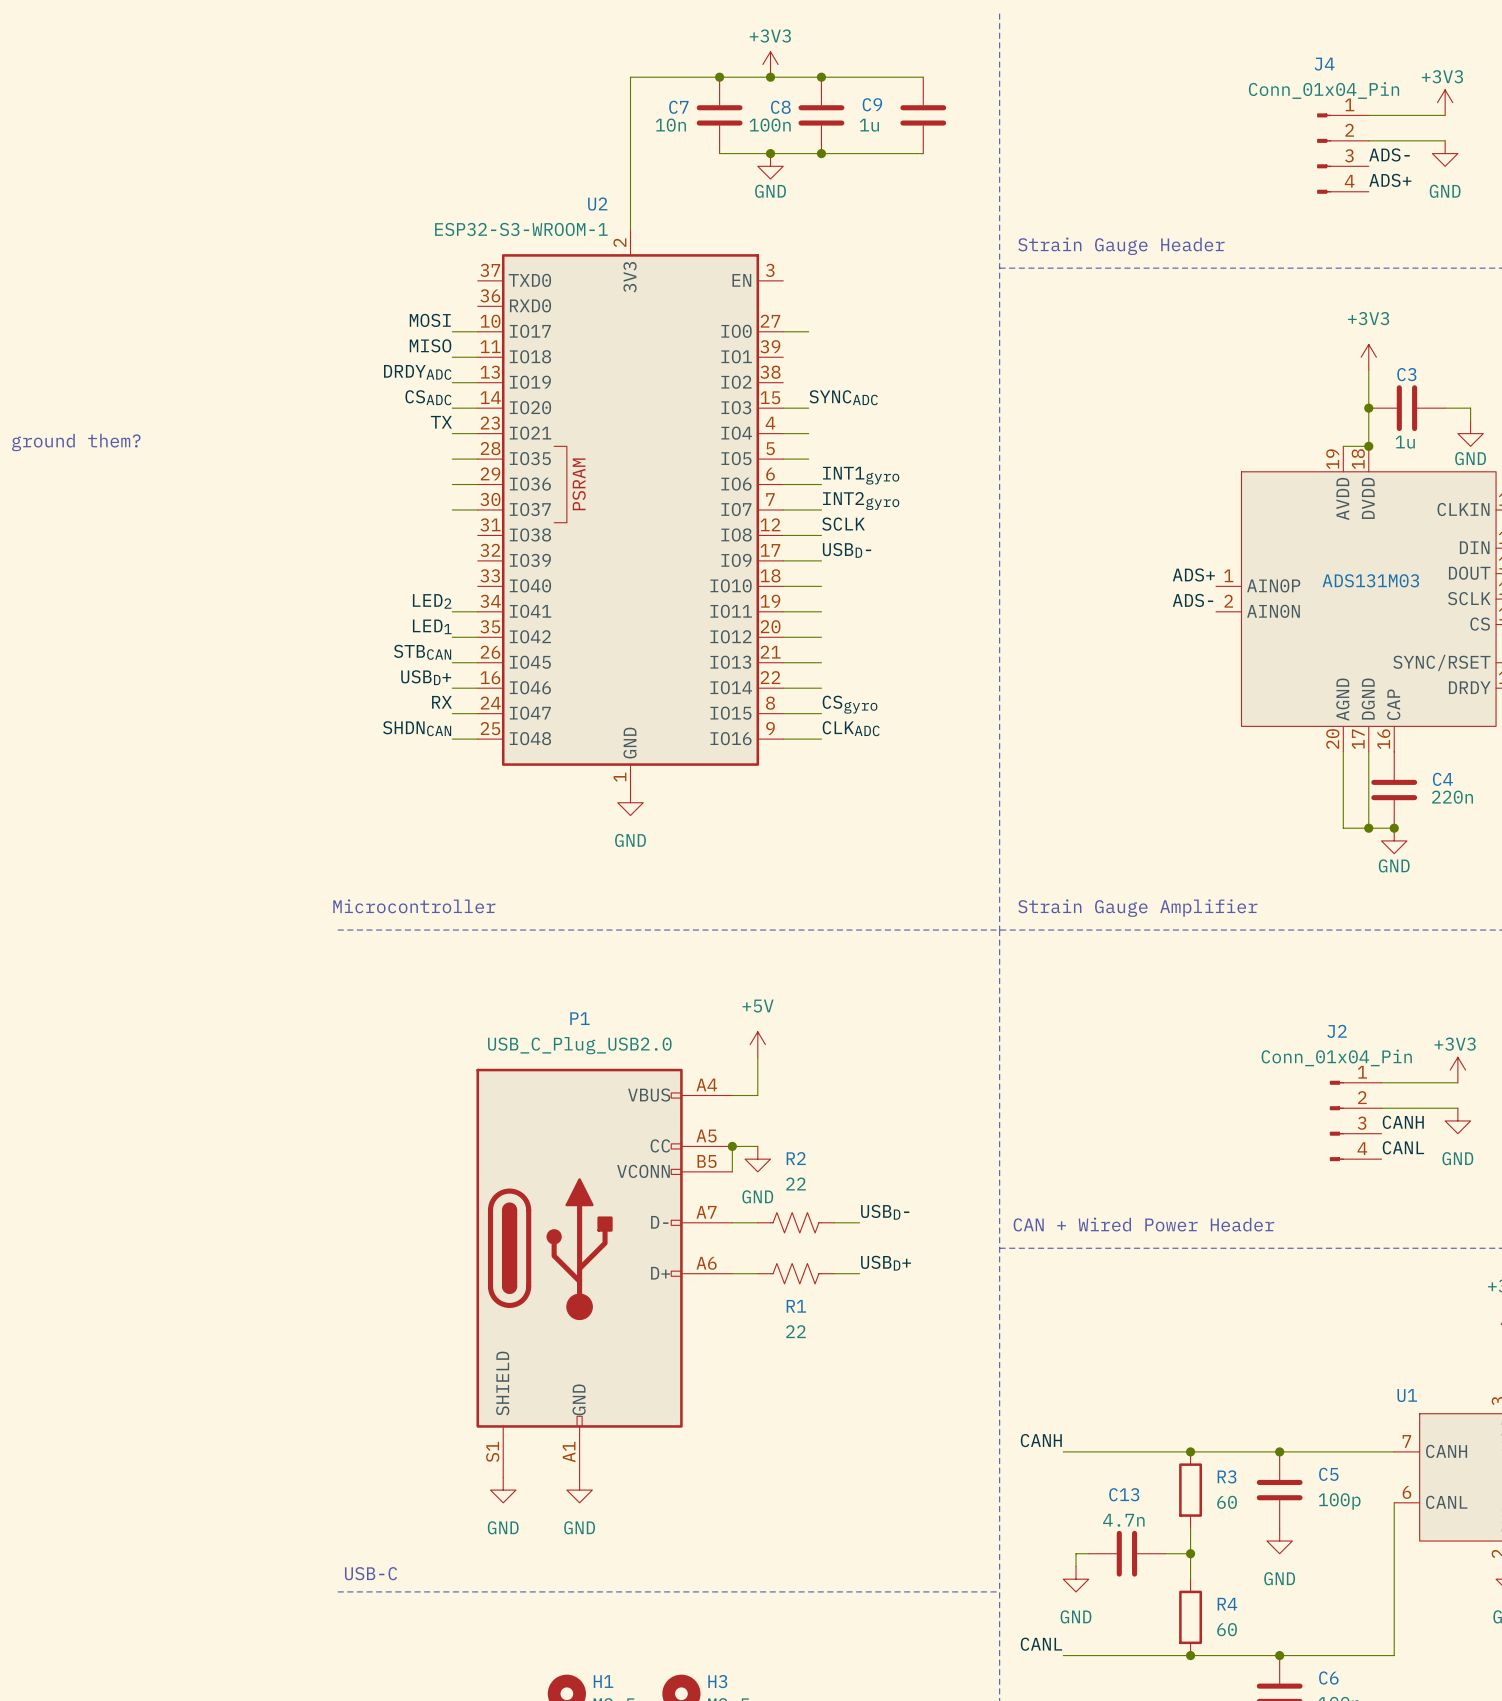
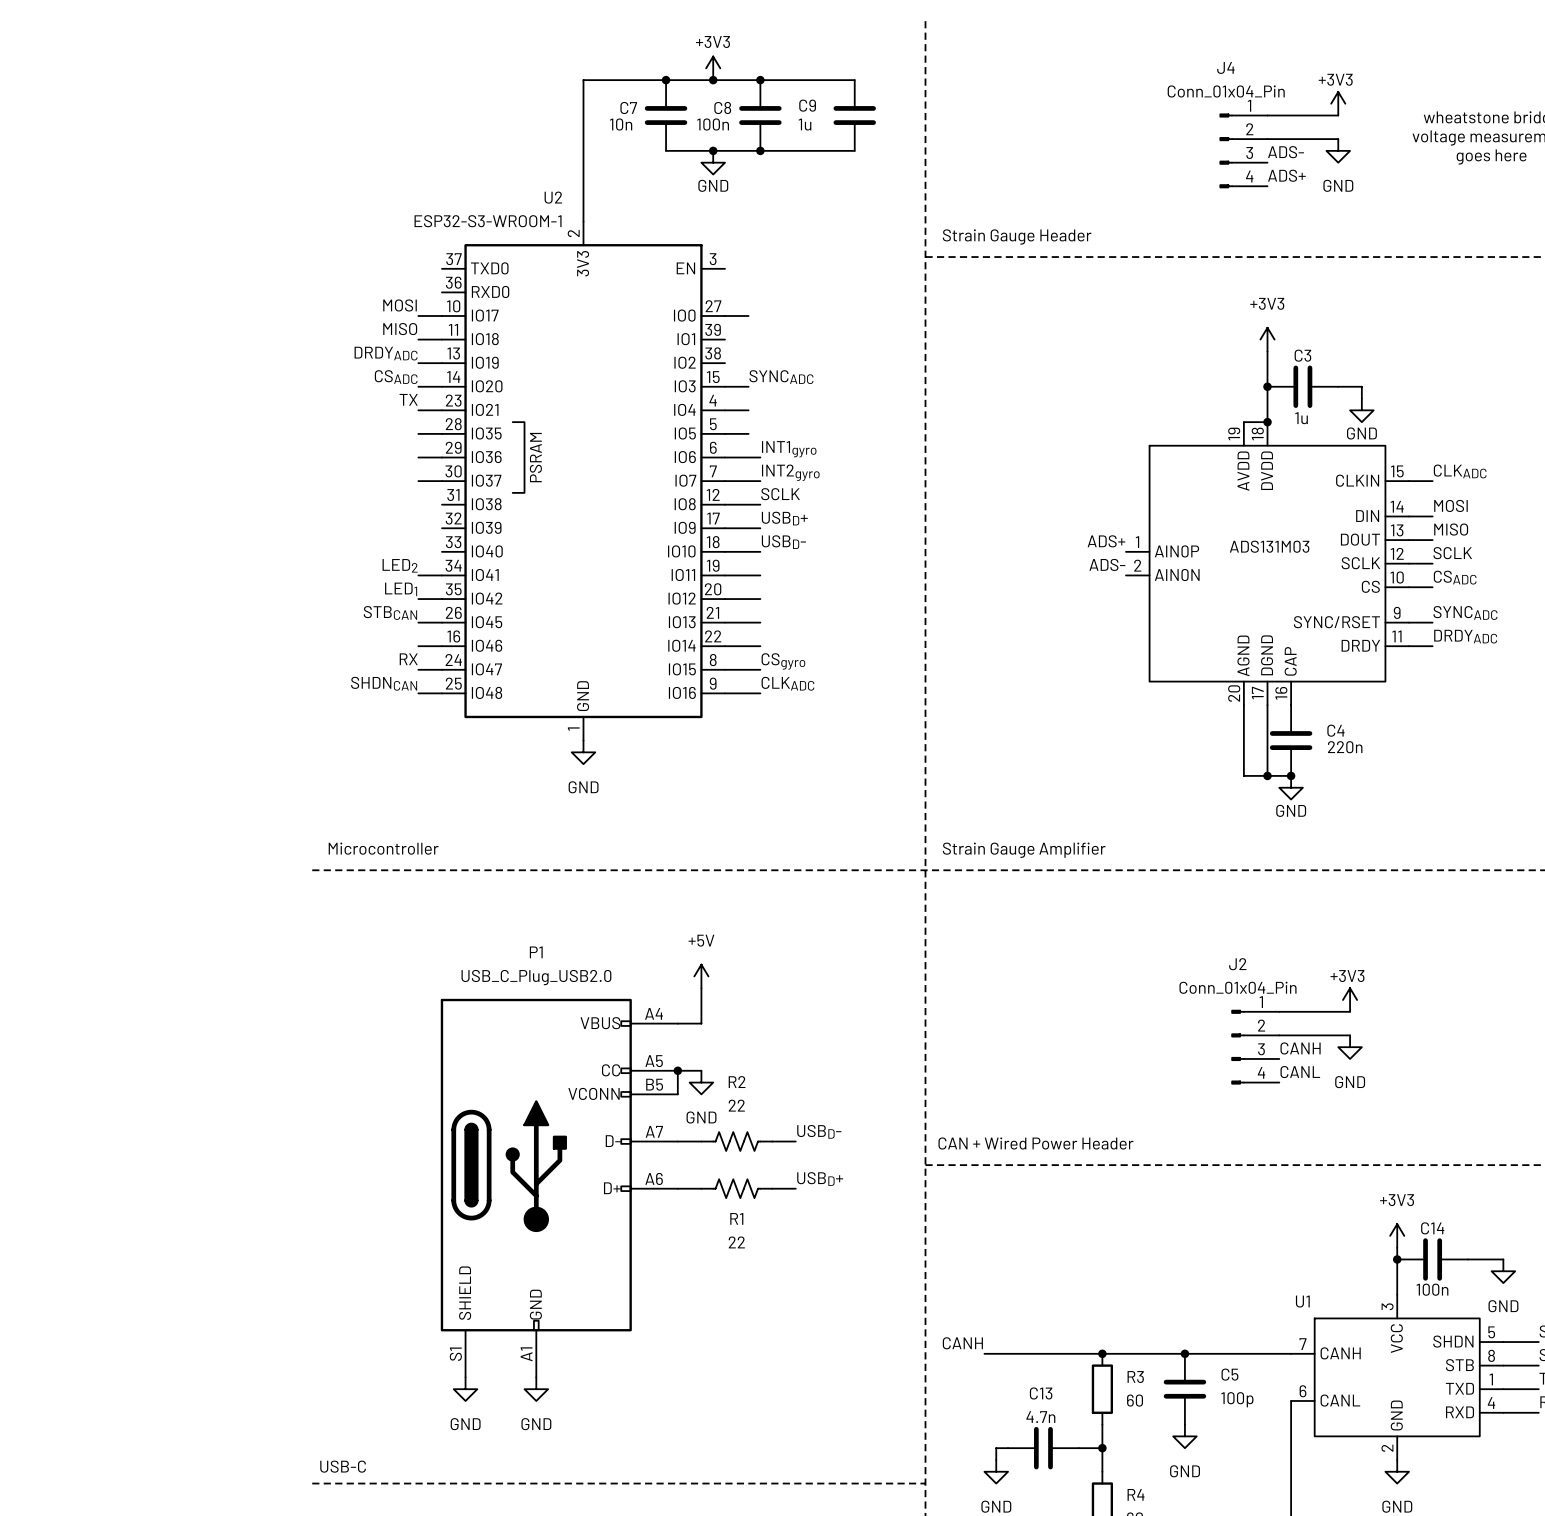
label: USBD- (847, 550) -> USBD+ (784, 518)
label: none -> USBD- (783, 542)
label: USBD+ (426, 677) -> none

